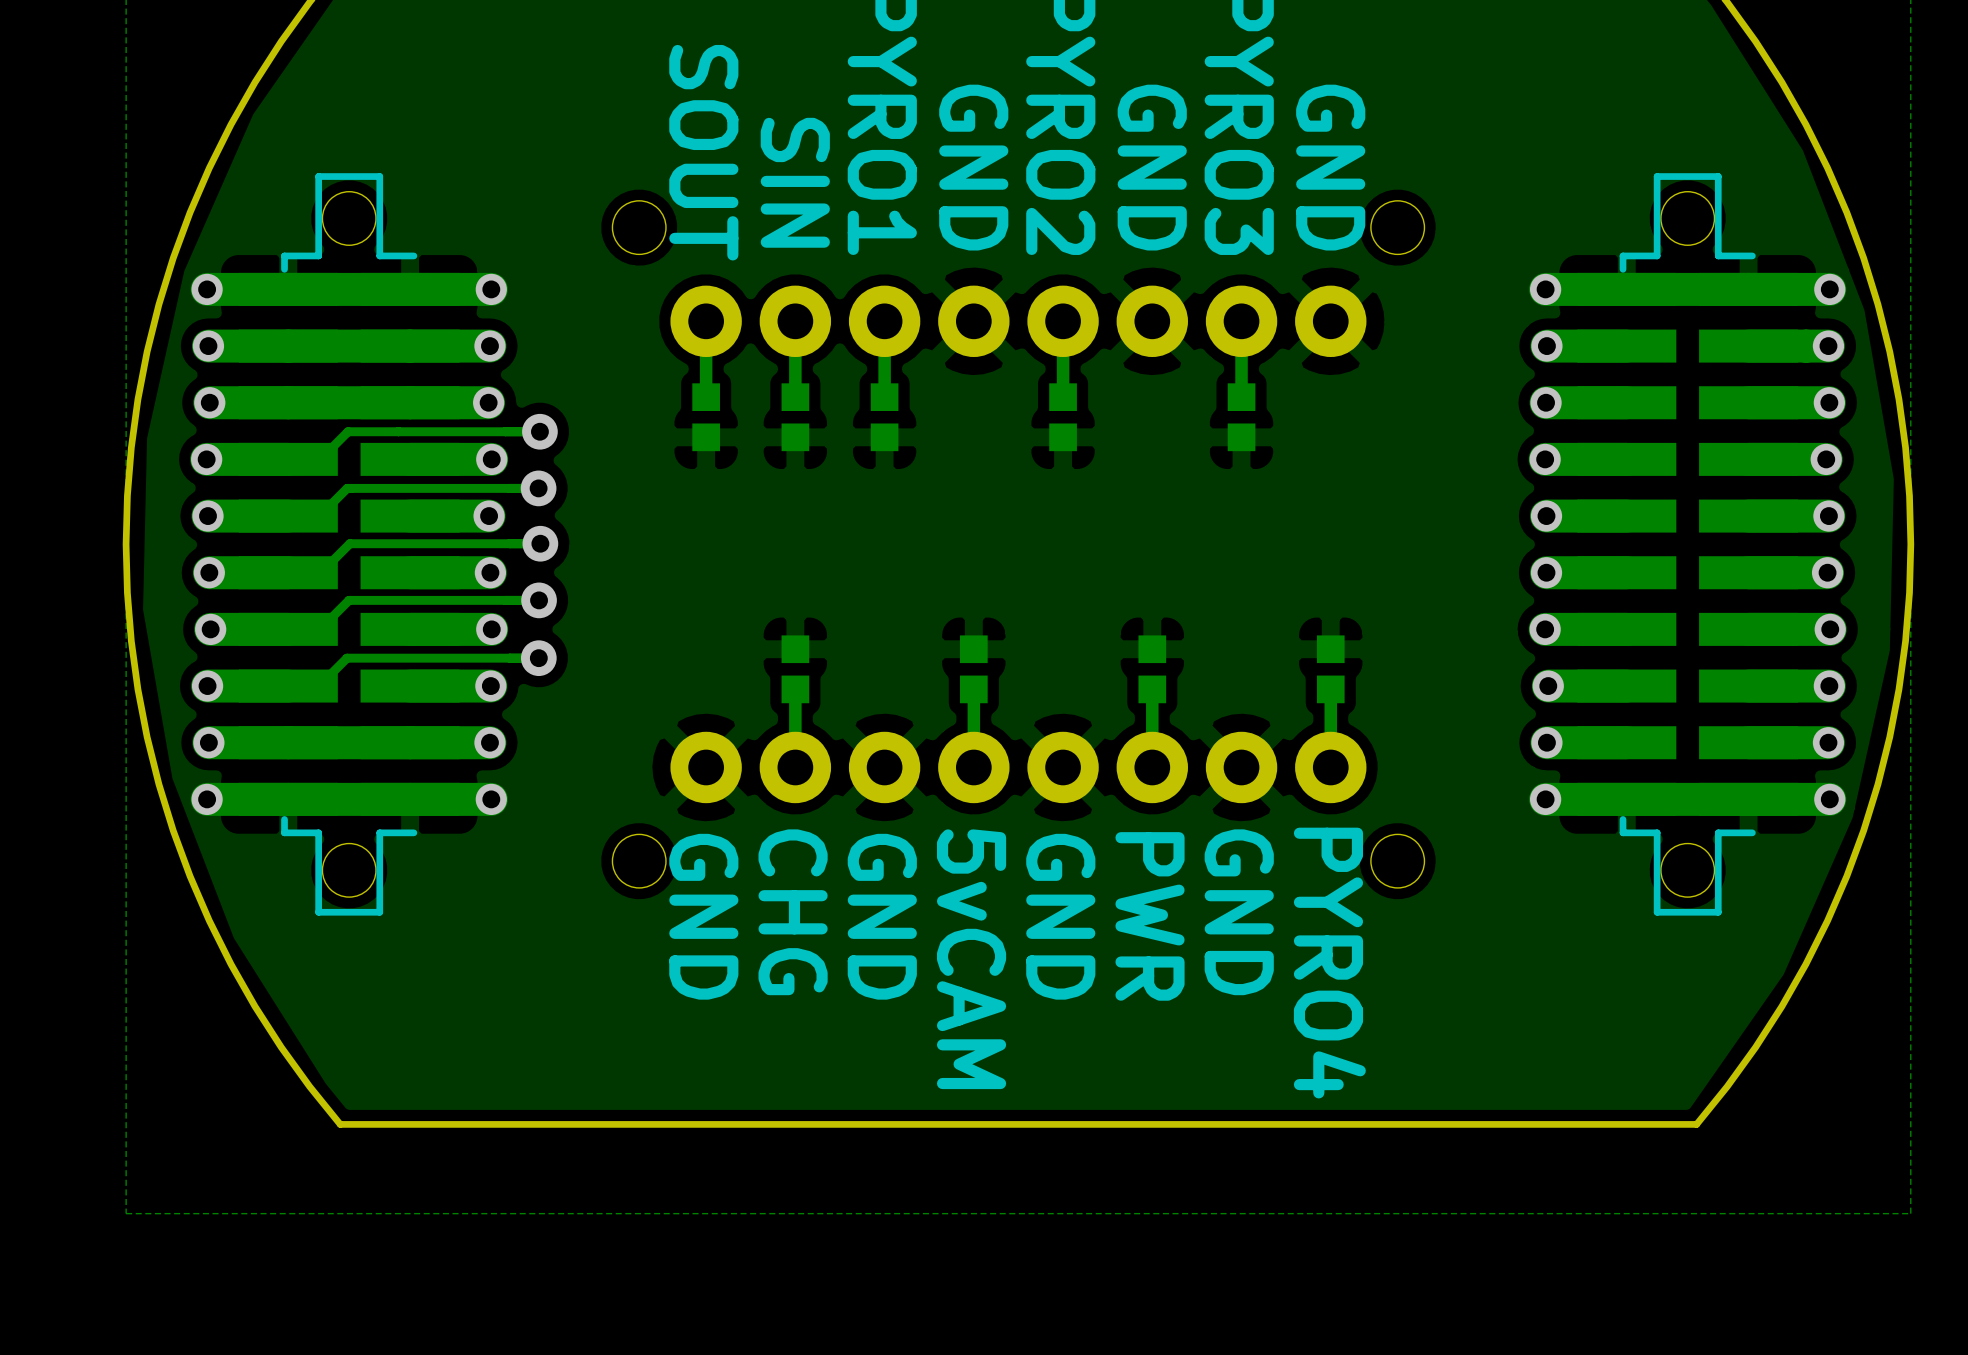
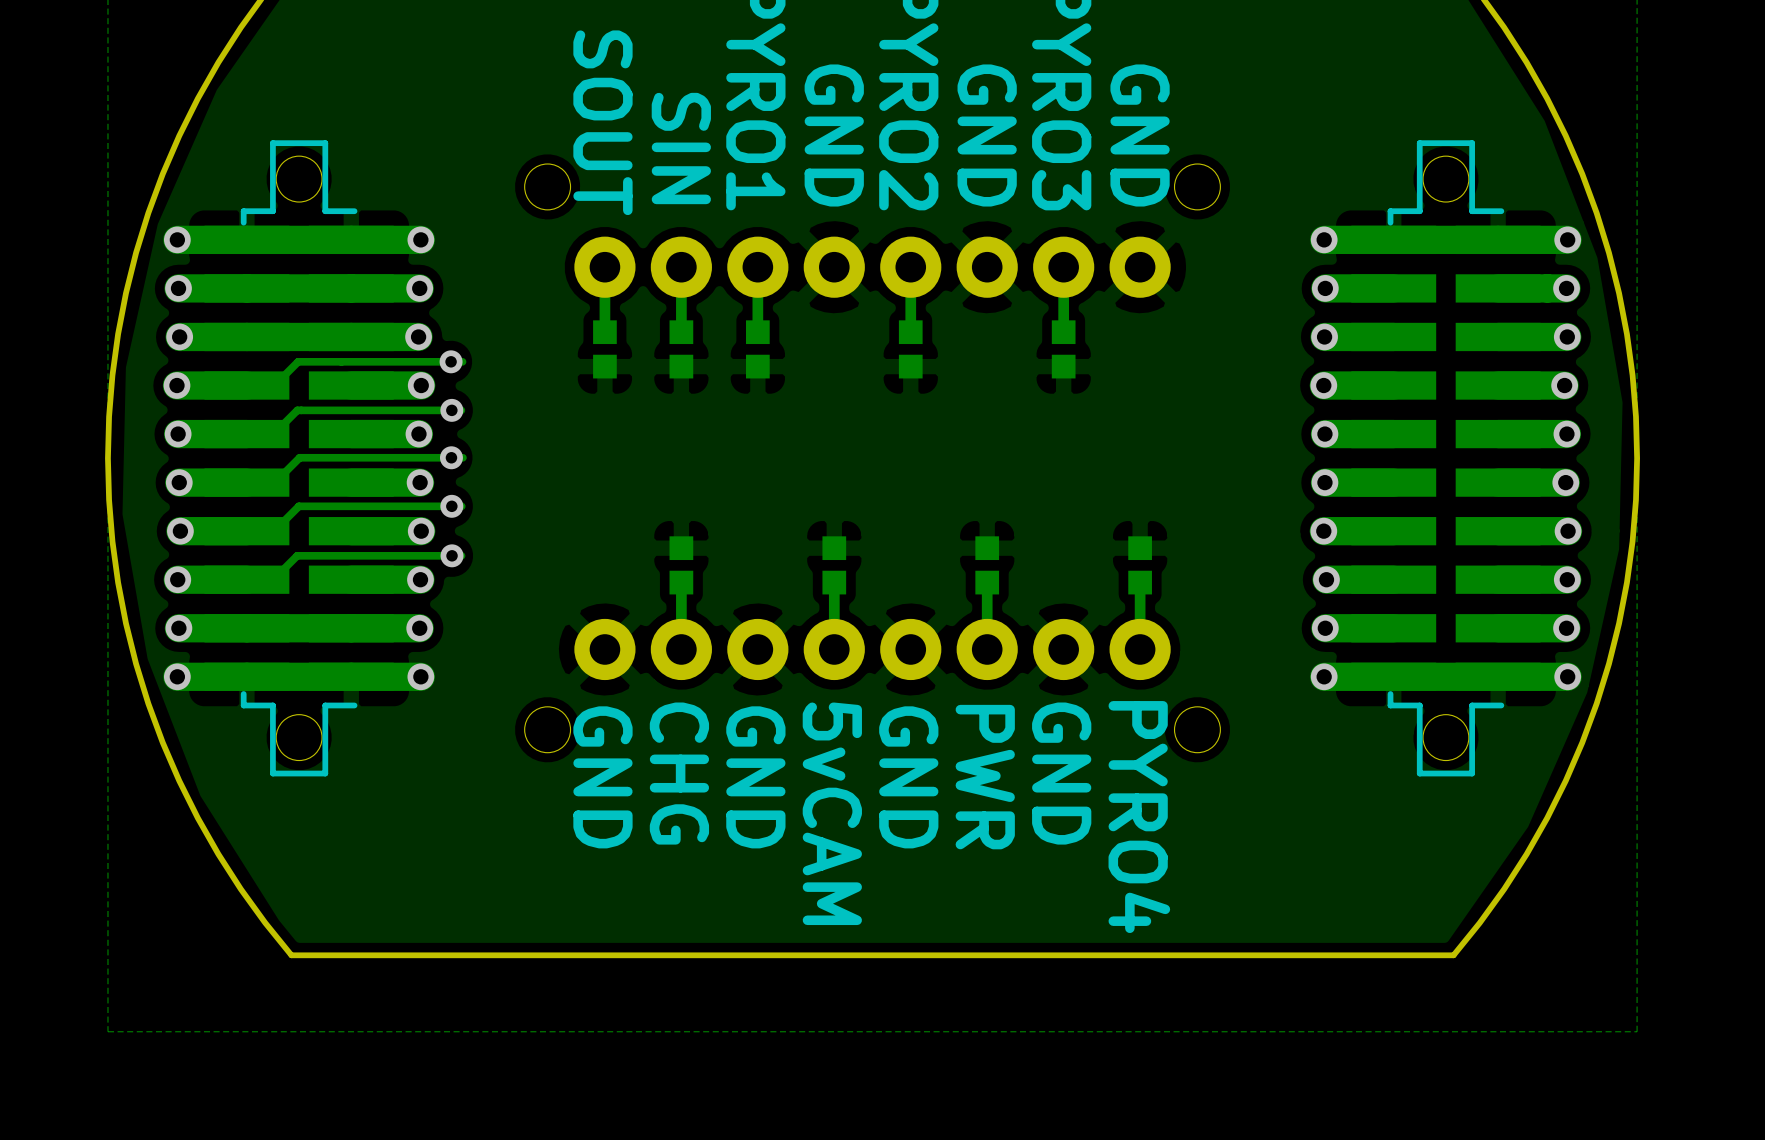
via size: [522, 413, 558, 450] -> [439, 350, 463, 374]
via size: [520, 470, 557, 507] -> [440, 398, 464, 422]
via size: [522, 525, 559, 562] -> [439, 446, 463, 470]
via size: [521, 582, 557, 619] -> [440, 494, 464, 518]
via size: [520, 640, 557, 677] -> [440, 544, 464, 568]

